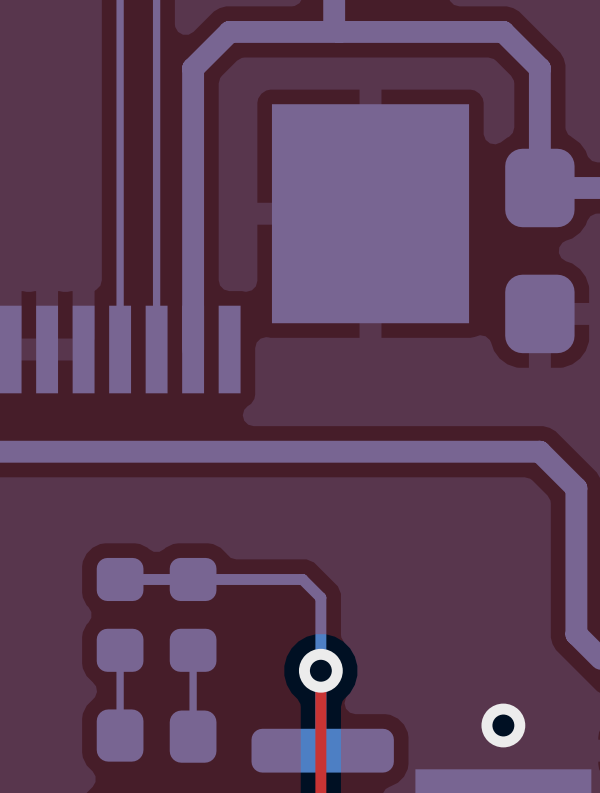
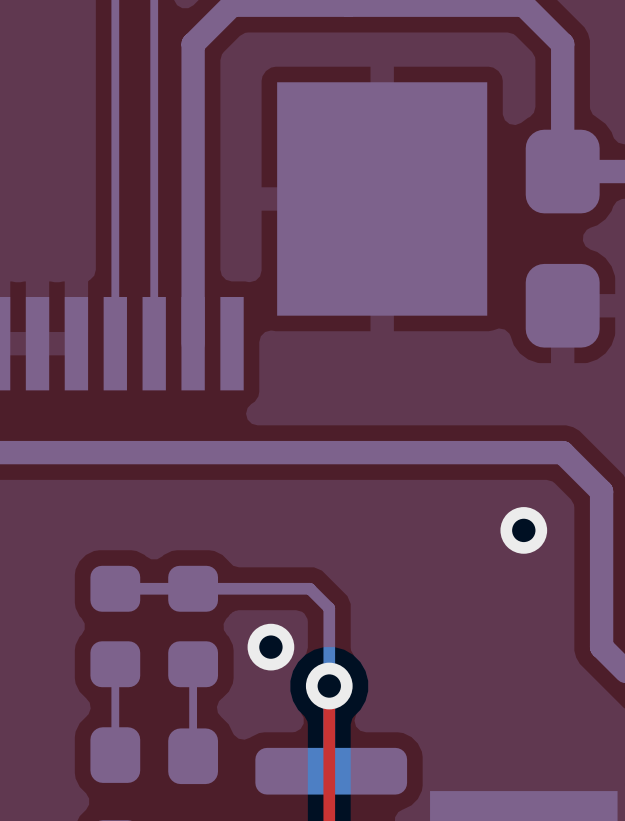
via: none -> (523, 530)
via: none -> (270, 647)
via: (503, 725) -> none

